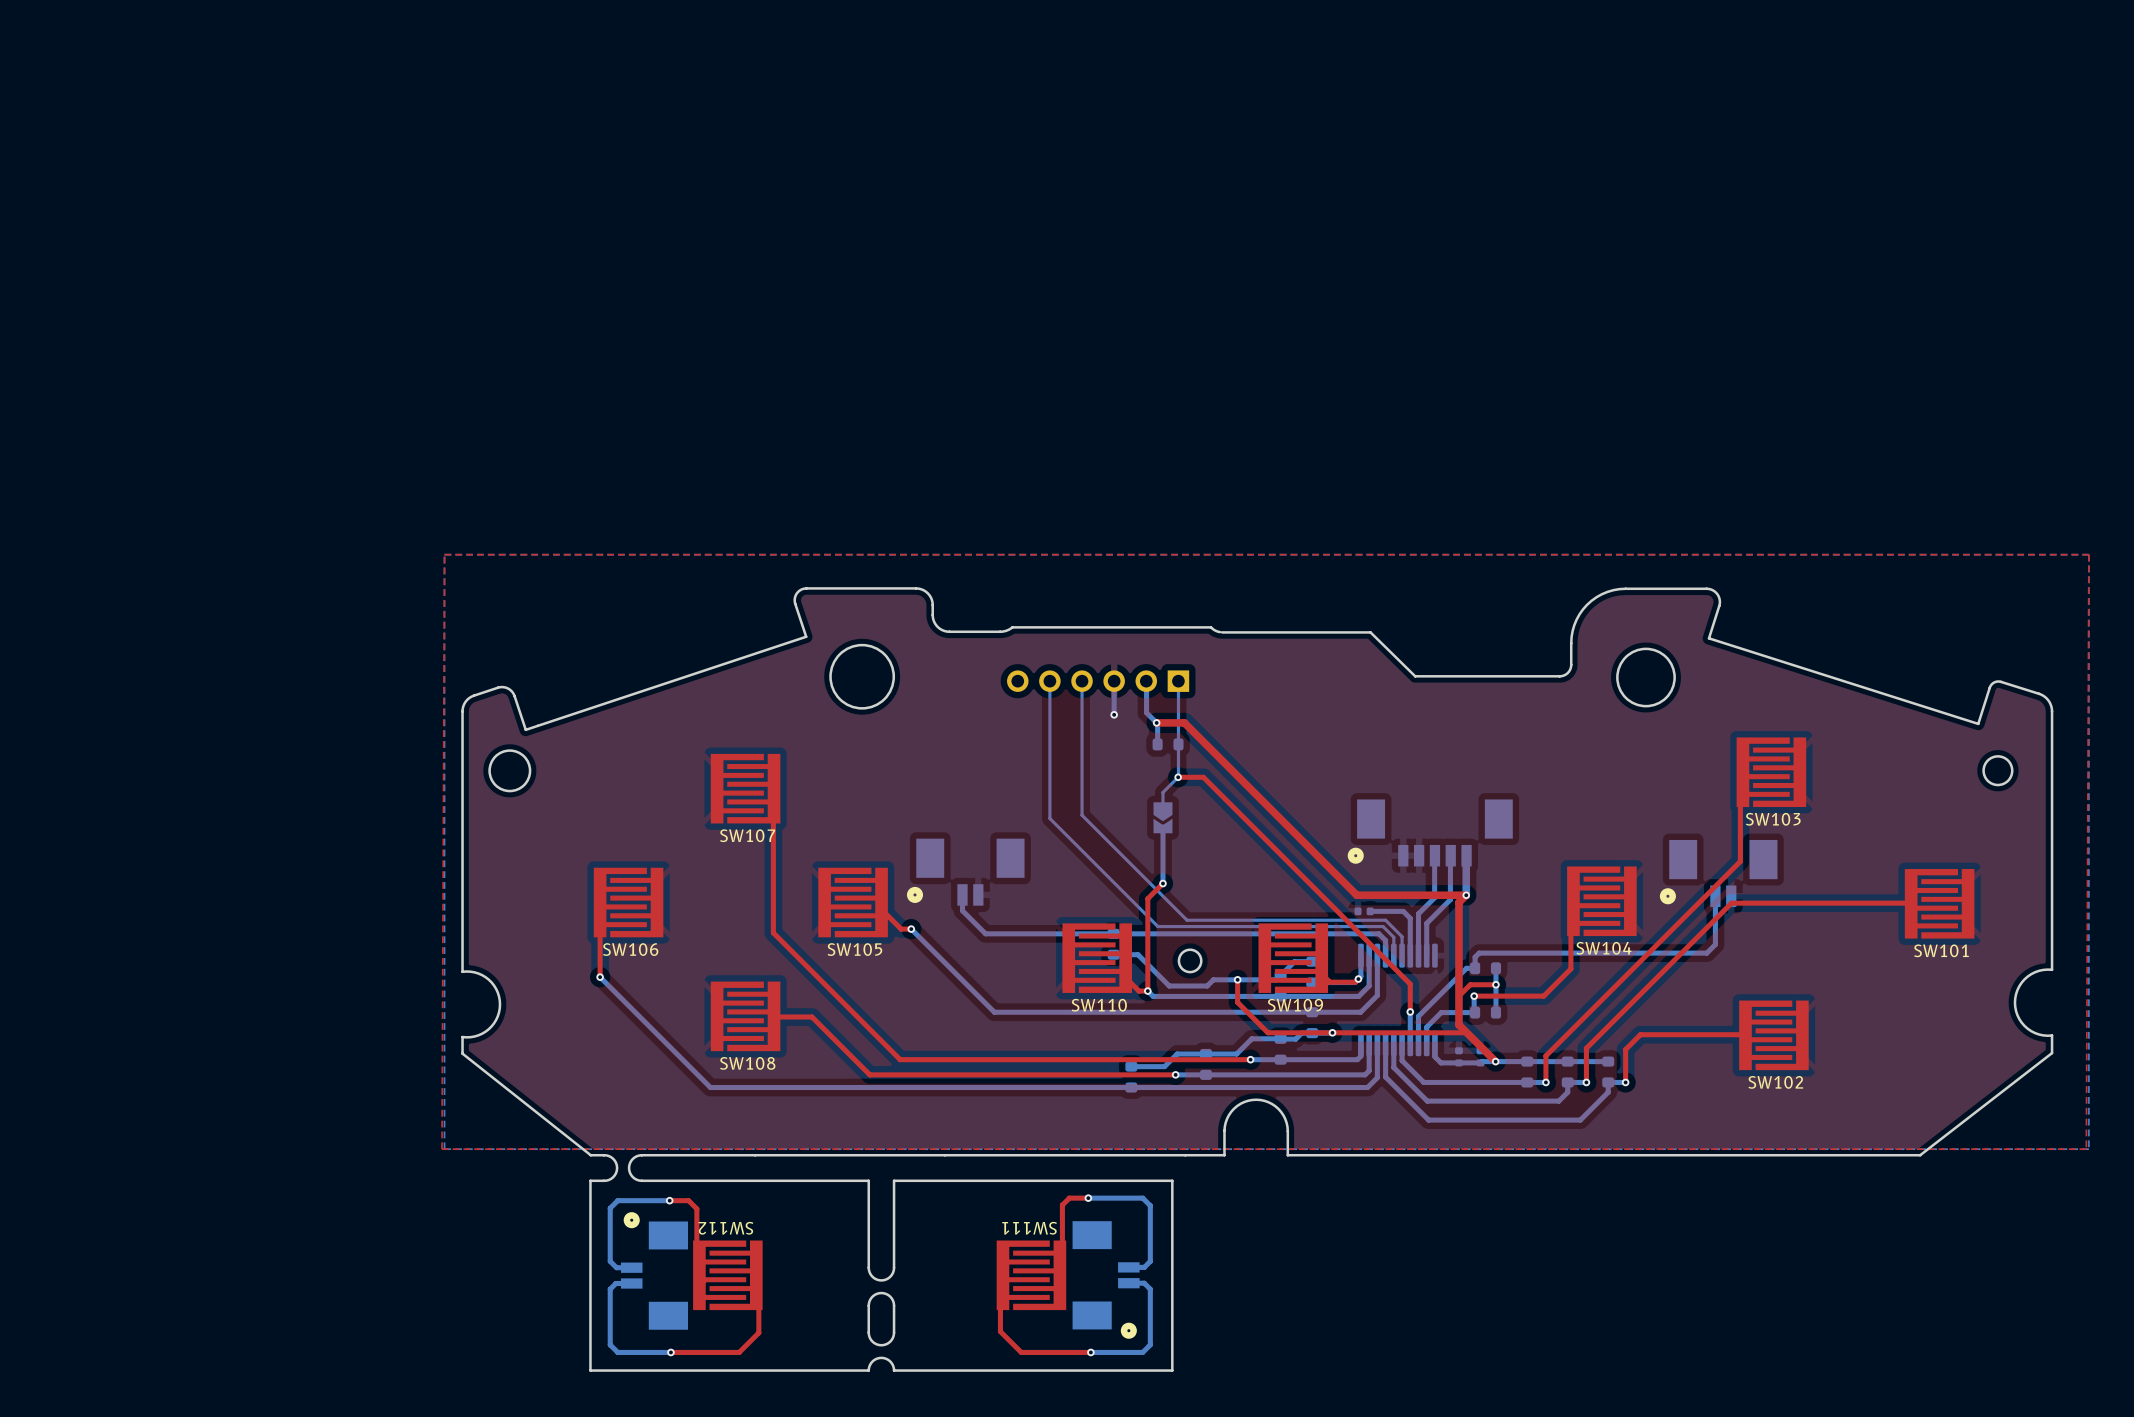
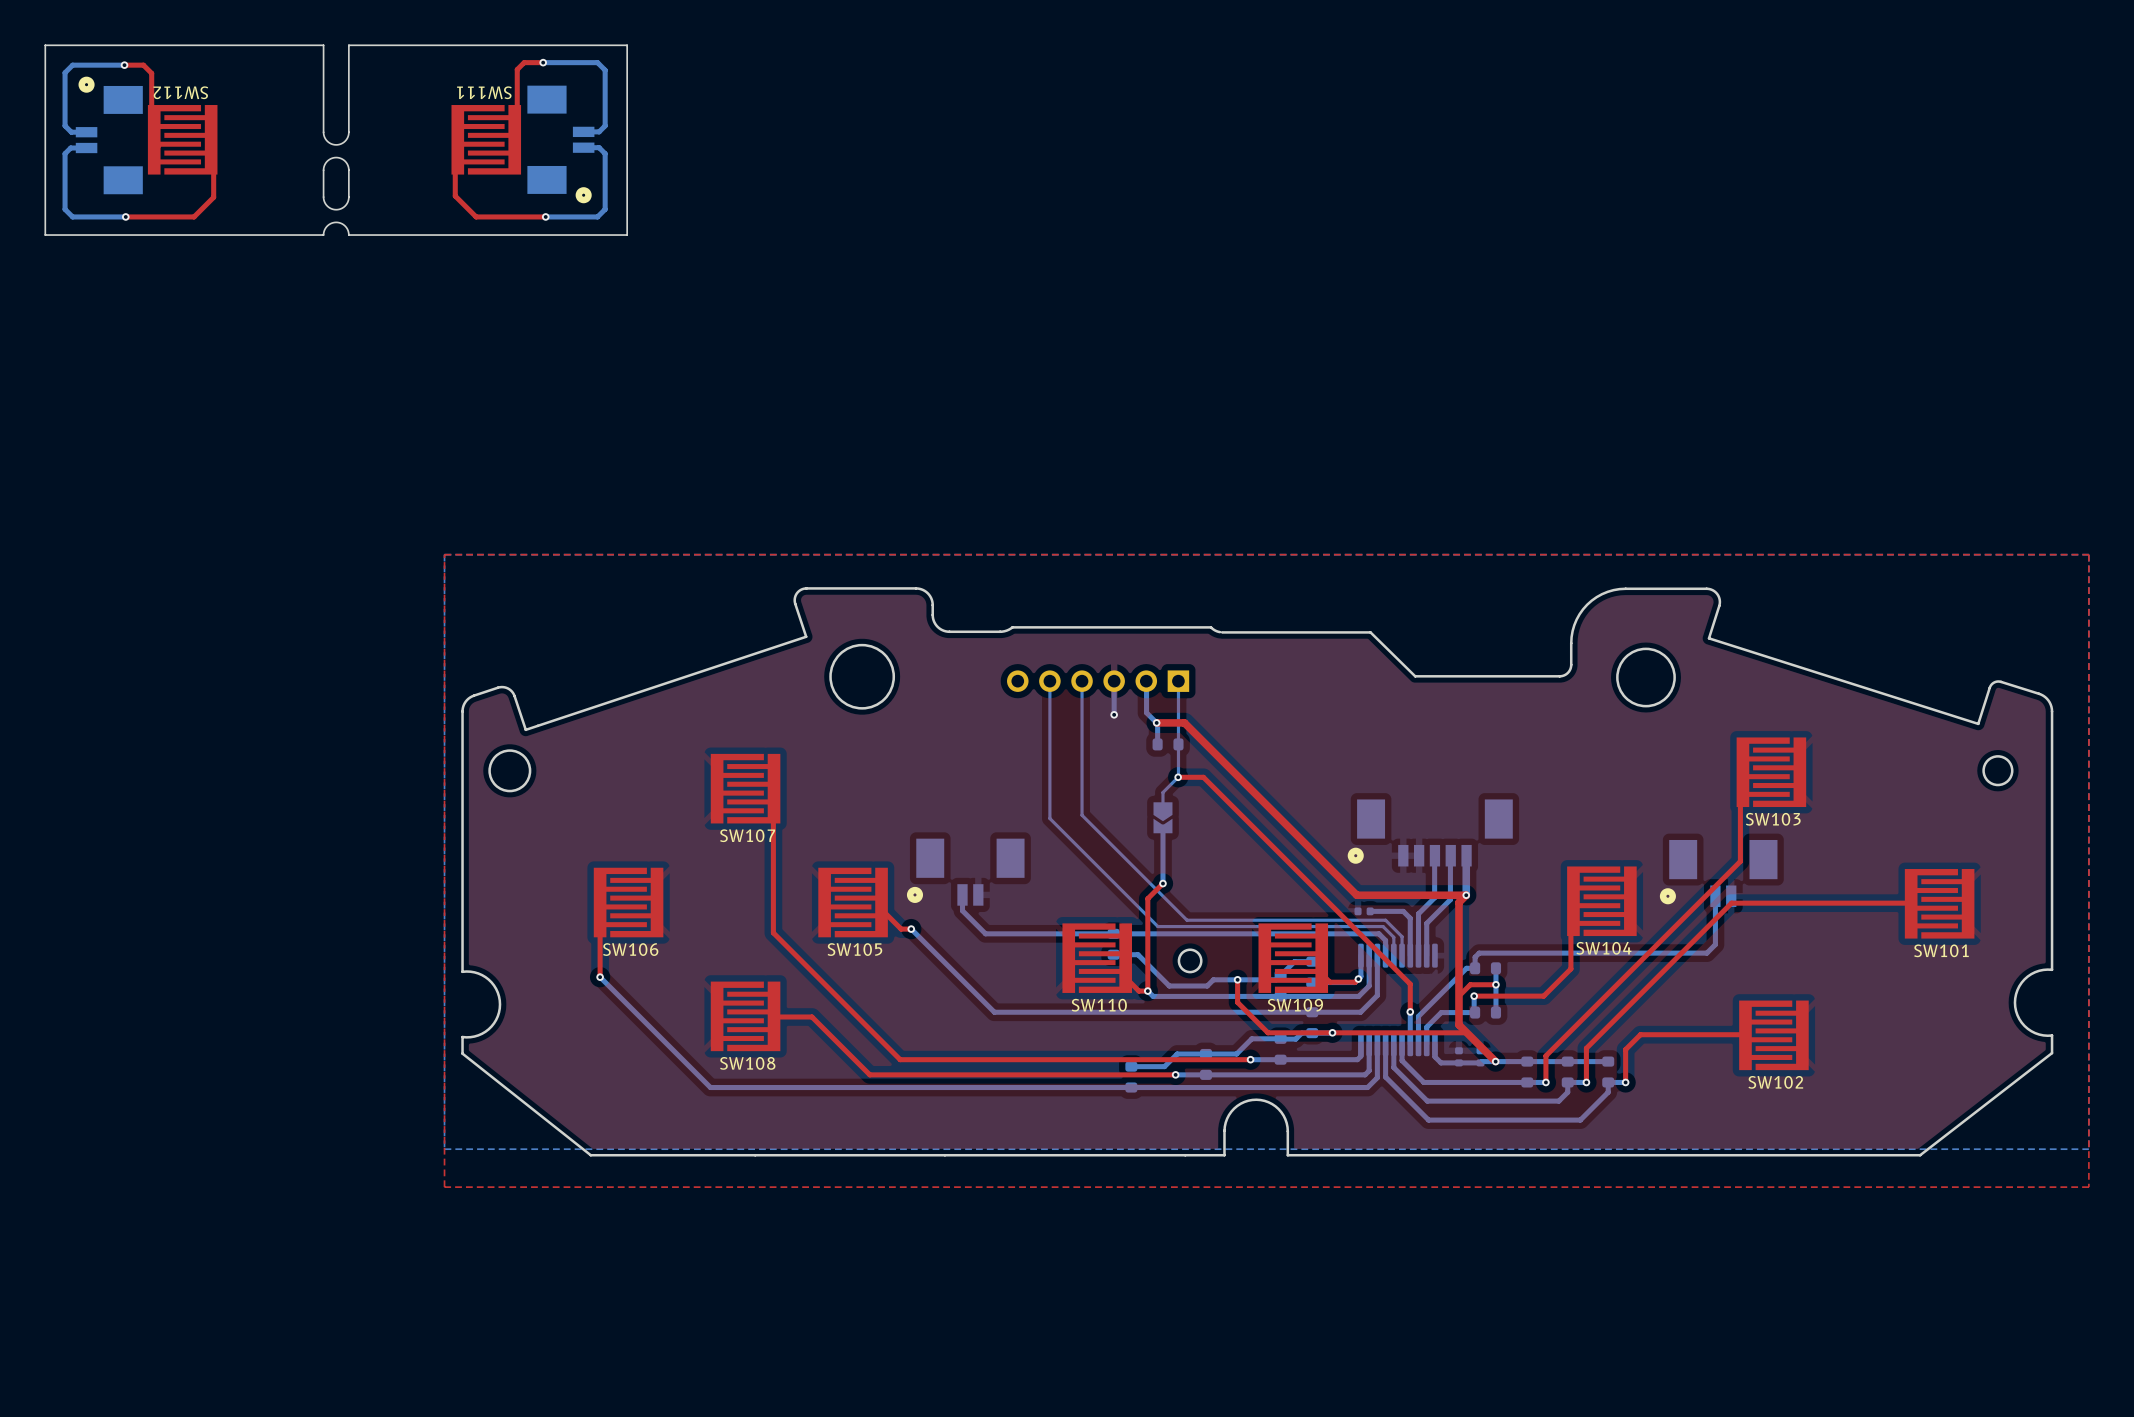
board edge: none -> (45, 45) (323, 45) (323, 133) (328, 142) (336, 144) (343, 142) (348, 133) (348, 45) (627, 45) (627, 235) (348, 235) (344, 225) (336, 222) (327, 225) (323, 235) (45, 235) (45, 45)
bottom track: none -> (543, 62) (597, 62) (605, 70) (605, 125) (599, 131) (581, 131)
top track: none -> (543, 62) (524, 62) (517, 69) (517, 140) (511, 146)
via: none -> (543, 62)
bottom track: none -> (124, 65) (72, 65) (65, 72) (65, 125) (71, 132) (87, 132)
top track: none -> (124, 65) (143, 65) (151, 73) (151, 139) (158, 146) (154, 149)
via: none -> (124, 65)
part: none -> (109, 135)
top track: none -> (455, 139) (455, 196) (476, 216) (545, 216)
top track: none -> (213, 140) (213, 197) (194, 216) (125, 216)
part: none -> (560, 144)
bottom track: none -> (581, 147) (599, 147) (605, 153) (605, 209) (597, 216) (545, 216)
bottom track: none -> (87, 148) (70, 148) (65, 153) (65, 209) (72, 216) (125, 216)
board edge: none -> (323, 170) (324, 201) (331, 208) (341, 208) (346, 204) (348, 198) (347, 165) (342, 159) (334, 157) (327, 161) (323, 170)
via: none -> (125, 216)
via: none -> (545, 216)
top zone outline: (444, 554) (441, 1149) (2086, 1149) (2088, 554) -> (444, 554) (444, 1187) (2088, 1187) (2088, 554)
board edge: (603, 1155) (613, 1159) (616, 1169) (614, 1175) (608, 1180) (590, 1180) (590, 1370) (868, 1370) (872, 1361) (881, 1357) (890, 1361) (894, 1370) (1172, 1370) (1172, 1180) (894, 1180) (893, 1269) (890, 1276) (881, 1280) (872, 1276) (868, 1269) (868, 1180) (640, 1180) (631, 1175) (629, 1168) (632, 1158) (641, 1155) -> (603, 1155) (641, 1155)
bottom track: (1088, 1198) (1142, 1198) (1150, 1205) (1150, 1261) (1144, 1267) (1126, 1267) -> none
top track: (1088, 1198) (1069, 1198) (1062, 1205) (1062, 1275) (1056, 1281) -> none
via: (1088, 1198) -> none
bottom track: (669, 1200) (617, 1200) (610, 1208) (610, 1261) (616, 1267) (632, 1267) -> none
top track: (669, 1200) (688, 1200) (696, 1208) (696, 1274) (703, 1281) (700, 1285) -> none
via: (669, 1200) -> none
part: (654, 1270) -> none
top track: (1000, 1274) (1000, 1331) (1021, 1352) (1090, 1352) -> none
SW112 position: (727, 1275) -> (182, 139)
top track: (758, 1275) (758, 1332) (739, 1352) (670, 1352) -> none
SW111 position: (1031, 1275) -> (486, 139)
part: (1106, 1279) -> none
bottom track: (632, 1283) (615, 1283) (610, 1289) (610, 1344) (617, 1352) (670, 1352) -> none
bottom track: (1126, 1283) (1144, 1283) (1150, 1289) (1150, 1344) (1142, 1352) (1090, 1352) -> none
board edge: (868, 1305) (869, 1337) (876, 1344) (886, 1344) (891, 1340) (893, 1334) (893, 1300) (886, 1294) (878, 1293) (871, 1298) (868, 1305) -> none
via: (670, 1352) -> none
via: (1090, 1352) -> none

